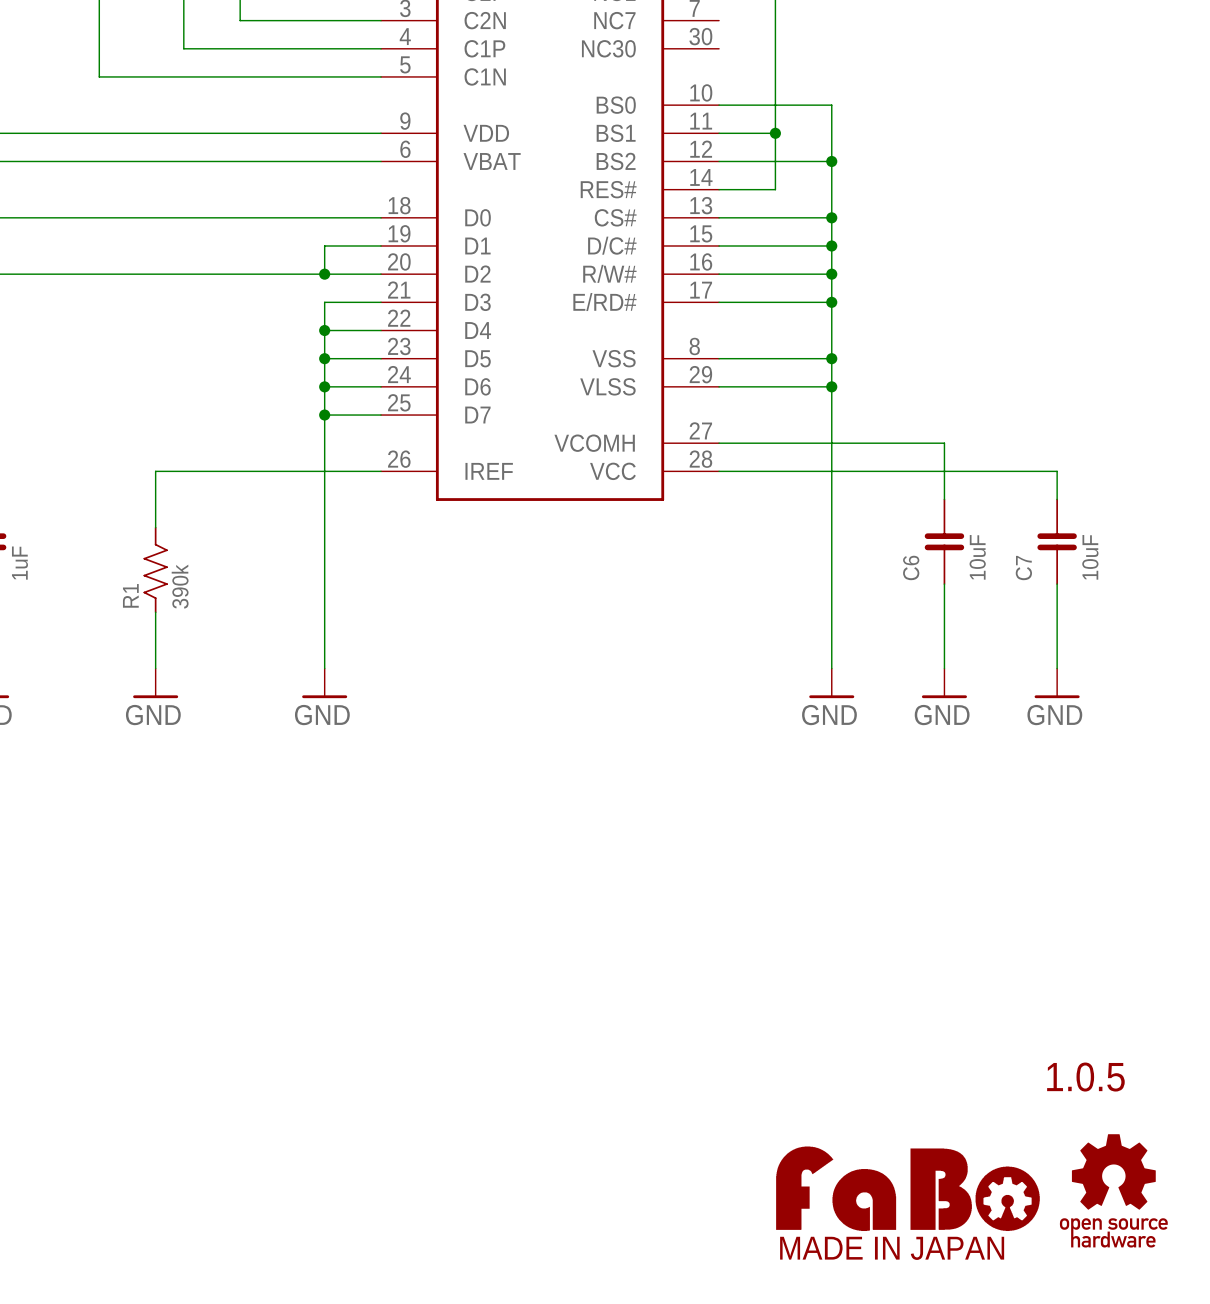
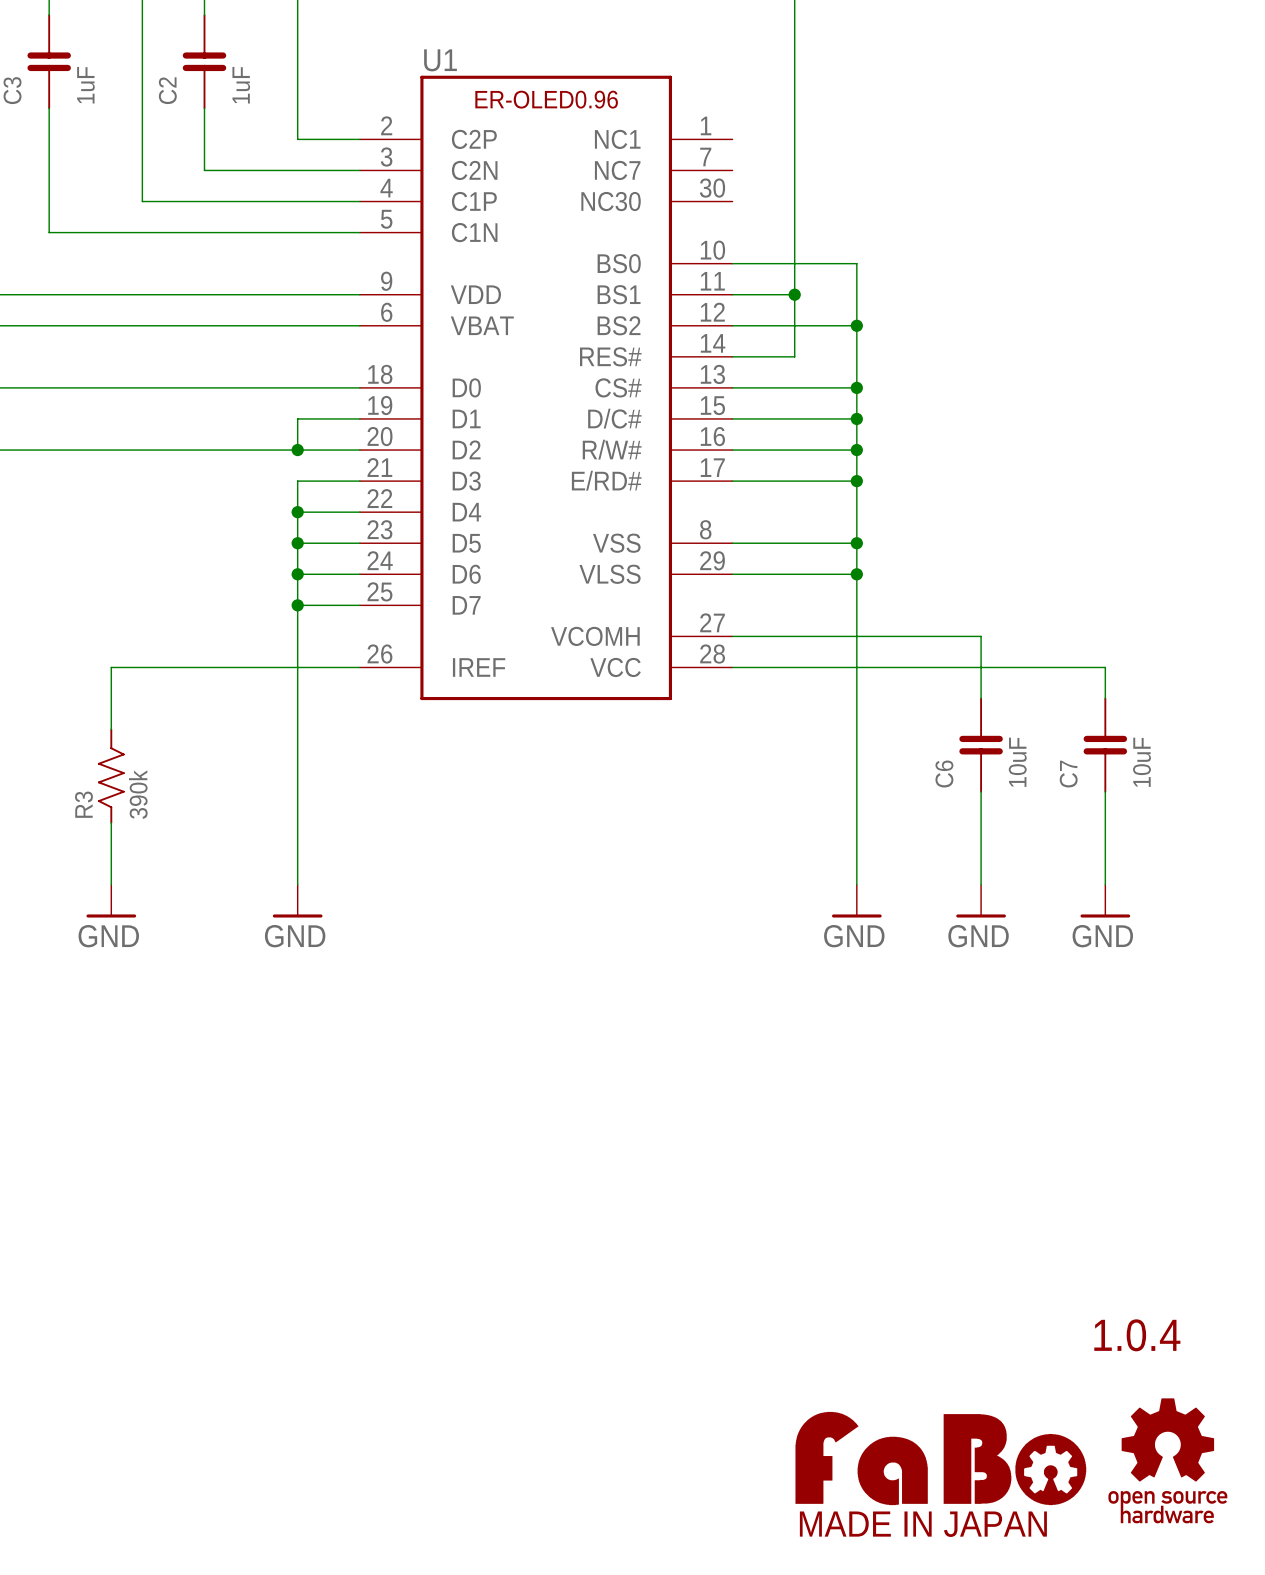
R1 name: R1 (130, 595) -> R3 (83, 804)
text: 1.0.5 (1085, 1077) -> 1.0.4 (1137, 1335)

